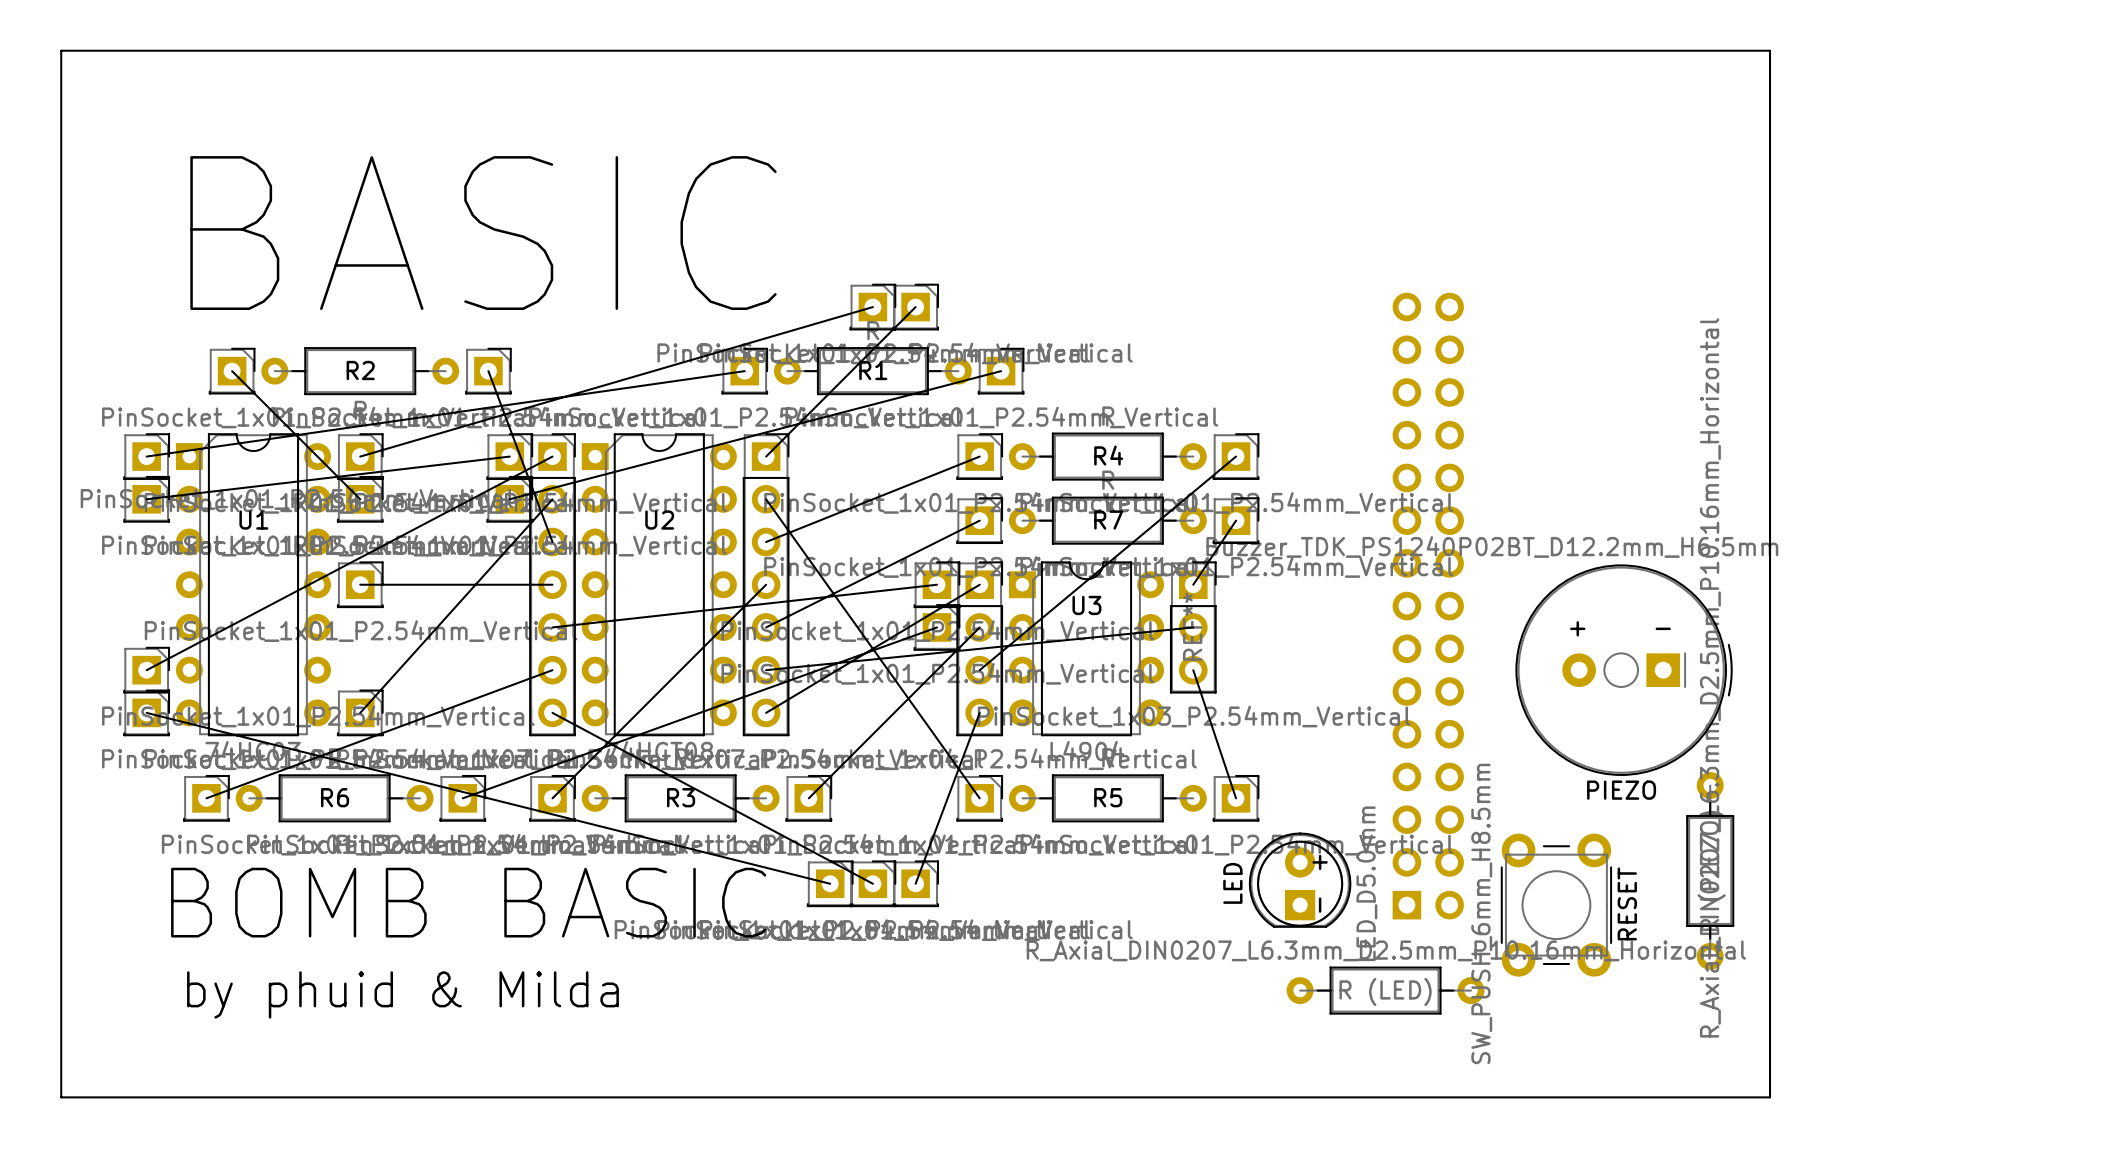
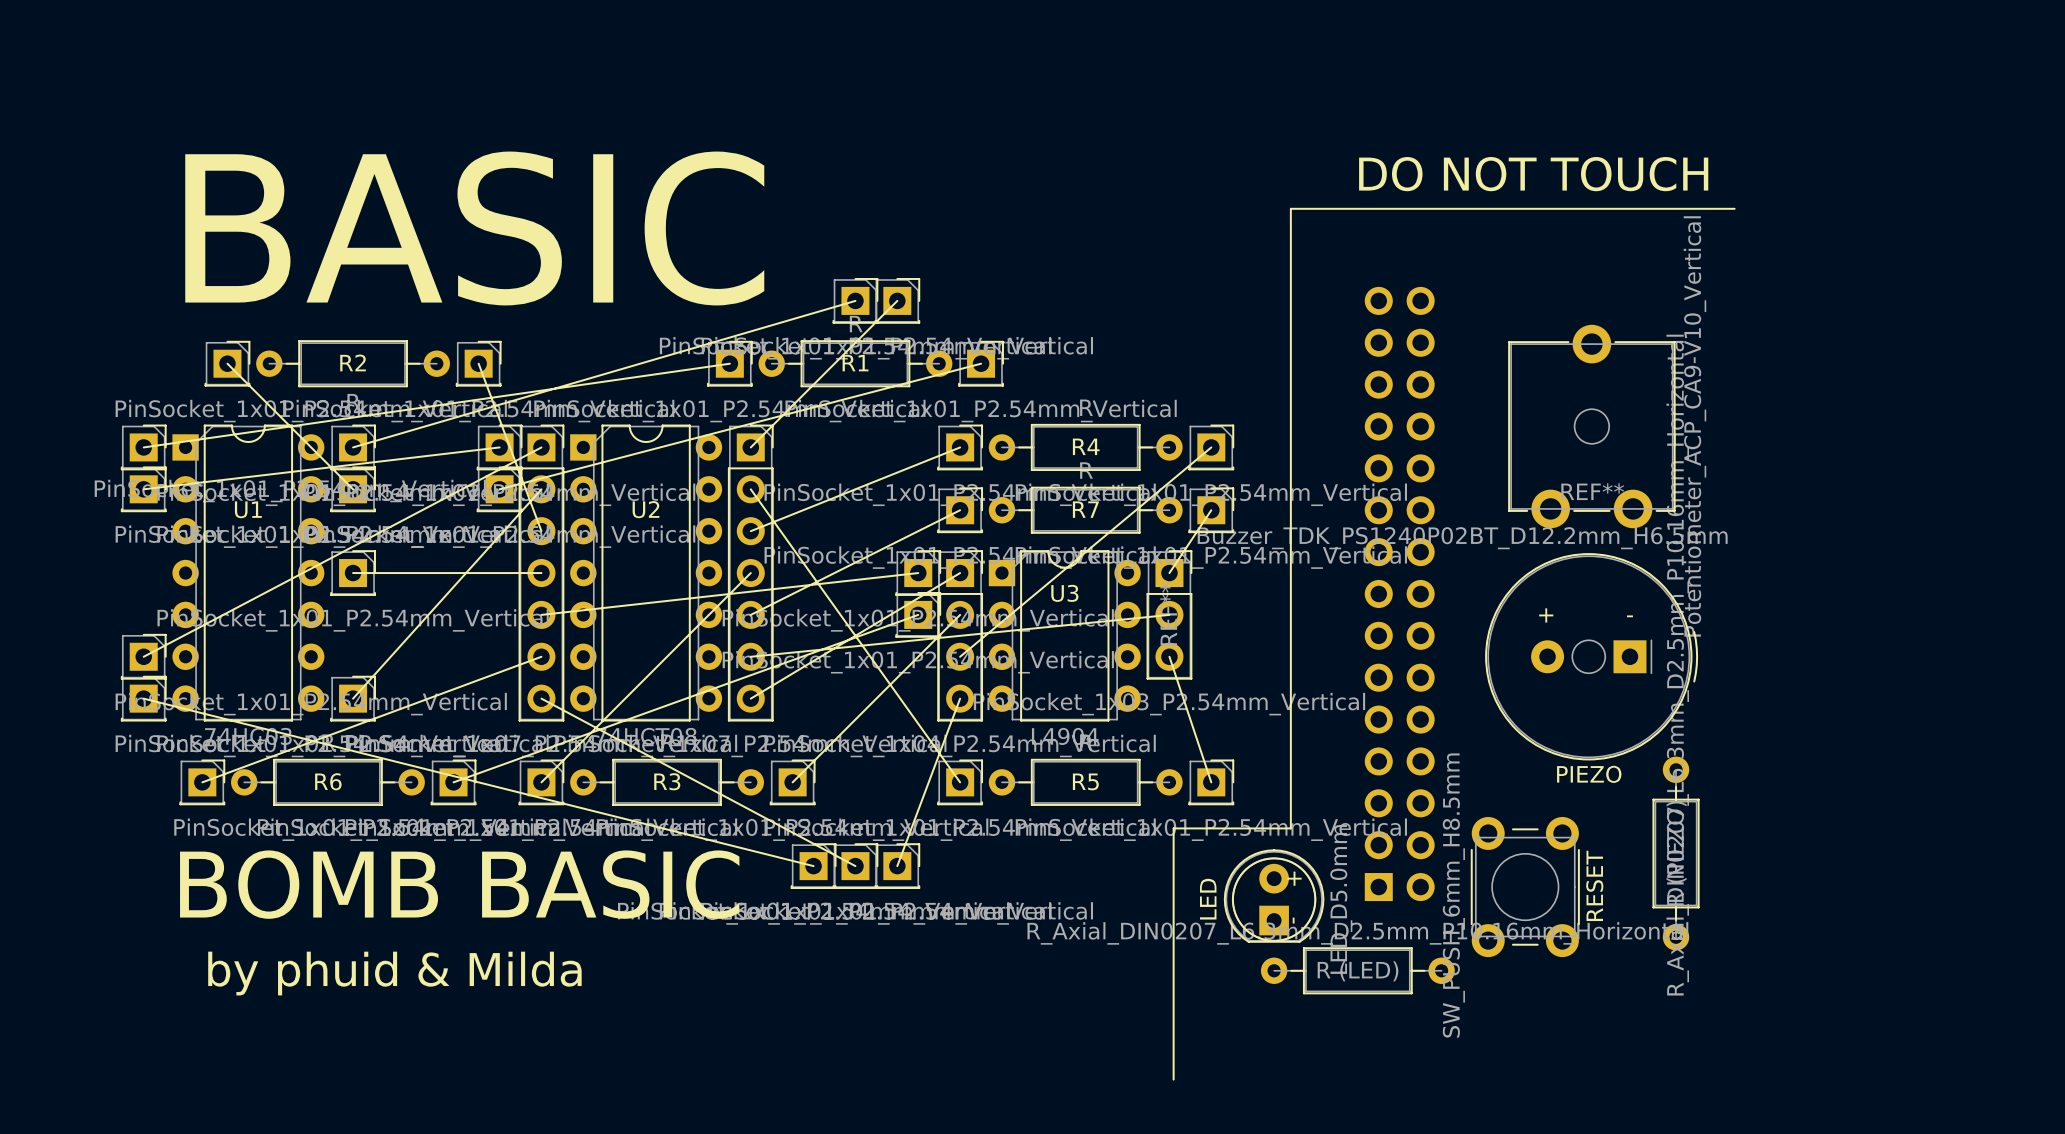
line: (61, 50) (61, 1097) (1770, 1097) (1770, 50) (61, 50) -> none
text: none -> DO NOT TOUCH (1533, 174)
line: none -> (1734, 208) (1290, 208) (1290, 828) (1173, 828) (1173, 1079)
REF**: none -> Potentiometer_ACP_CA9-V10_Vertical (1591, 426)
text: + (1320, 862) -> none
LED position: (1300, 880) -> (1274, 896)
text: - (1320, 905) -> + (1294, 878)
text: none -> - (1293, 920)

